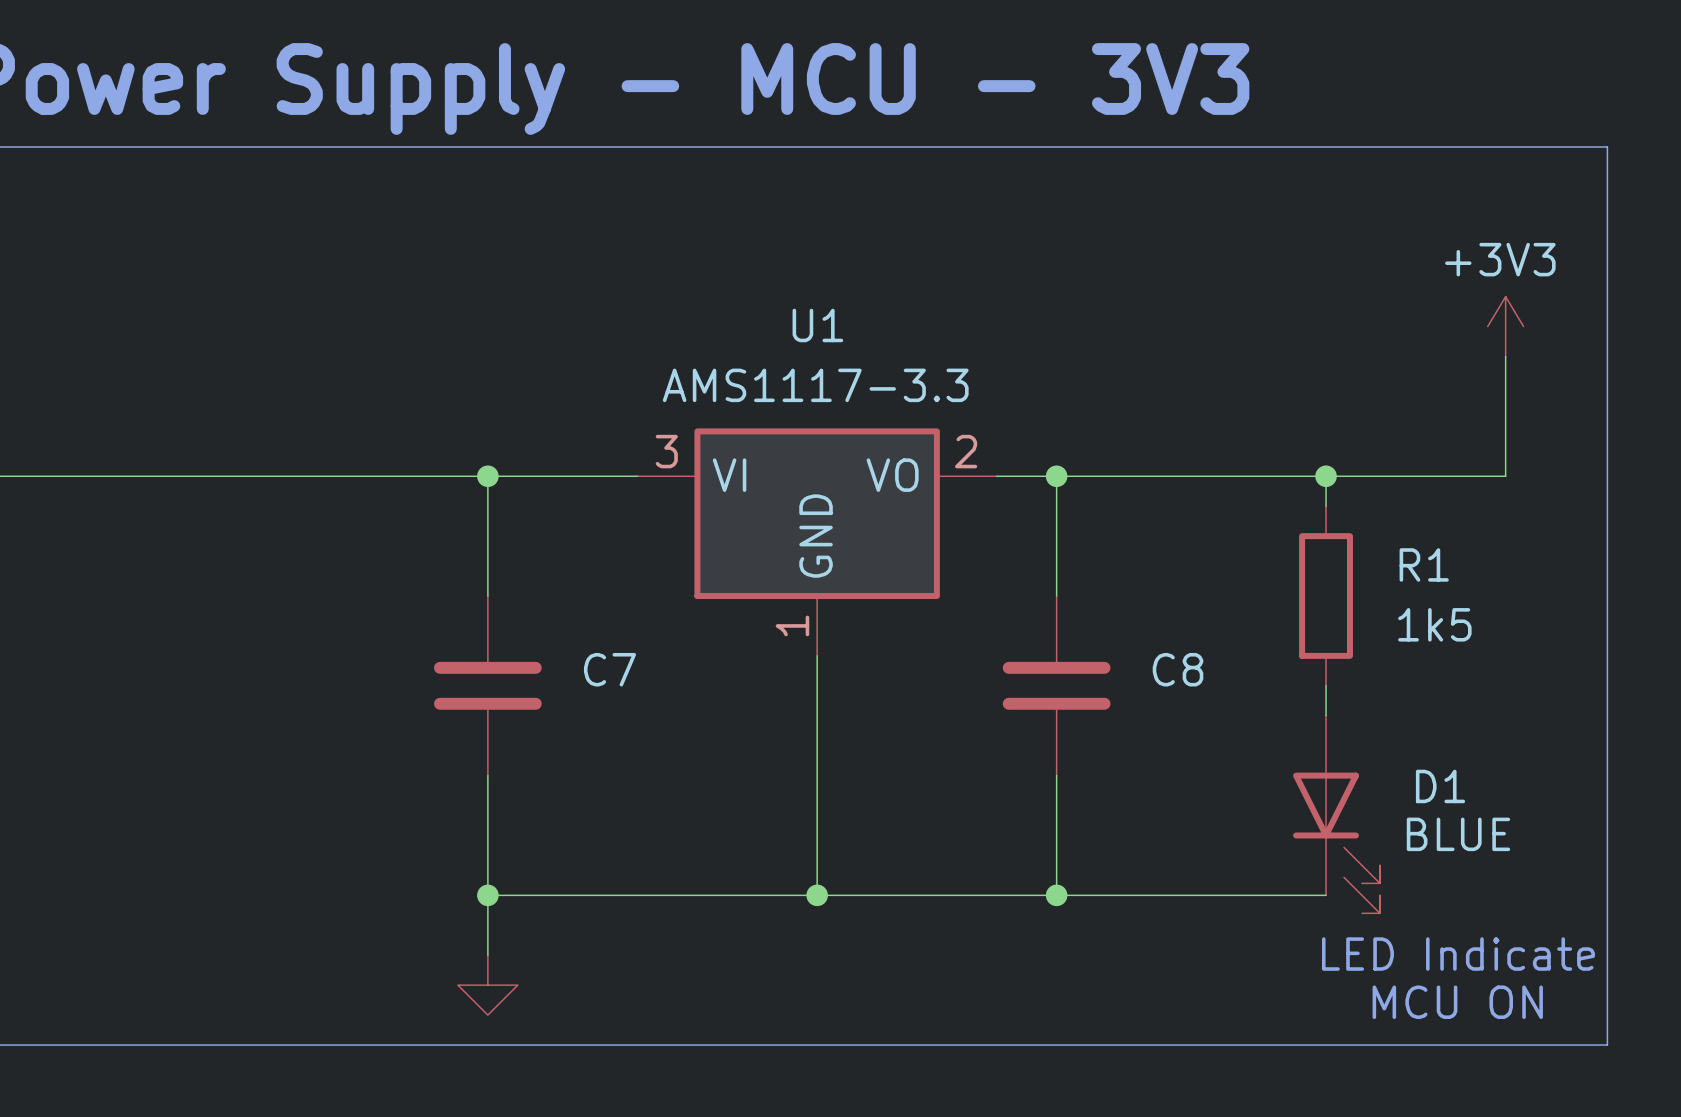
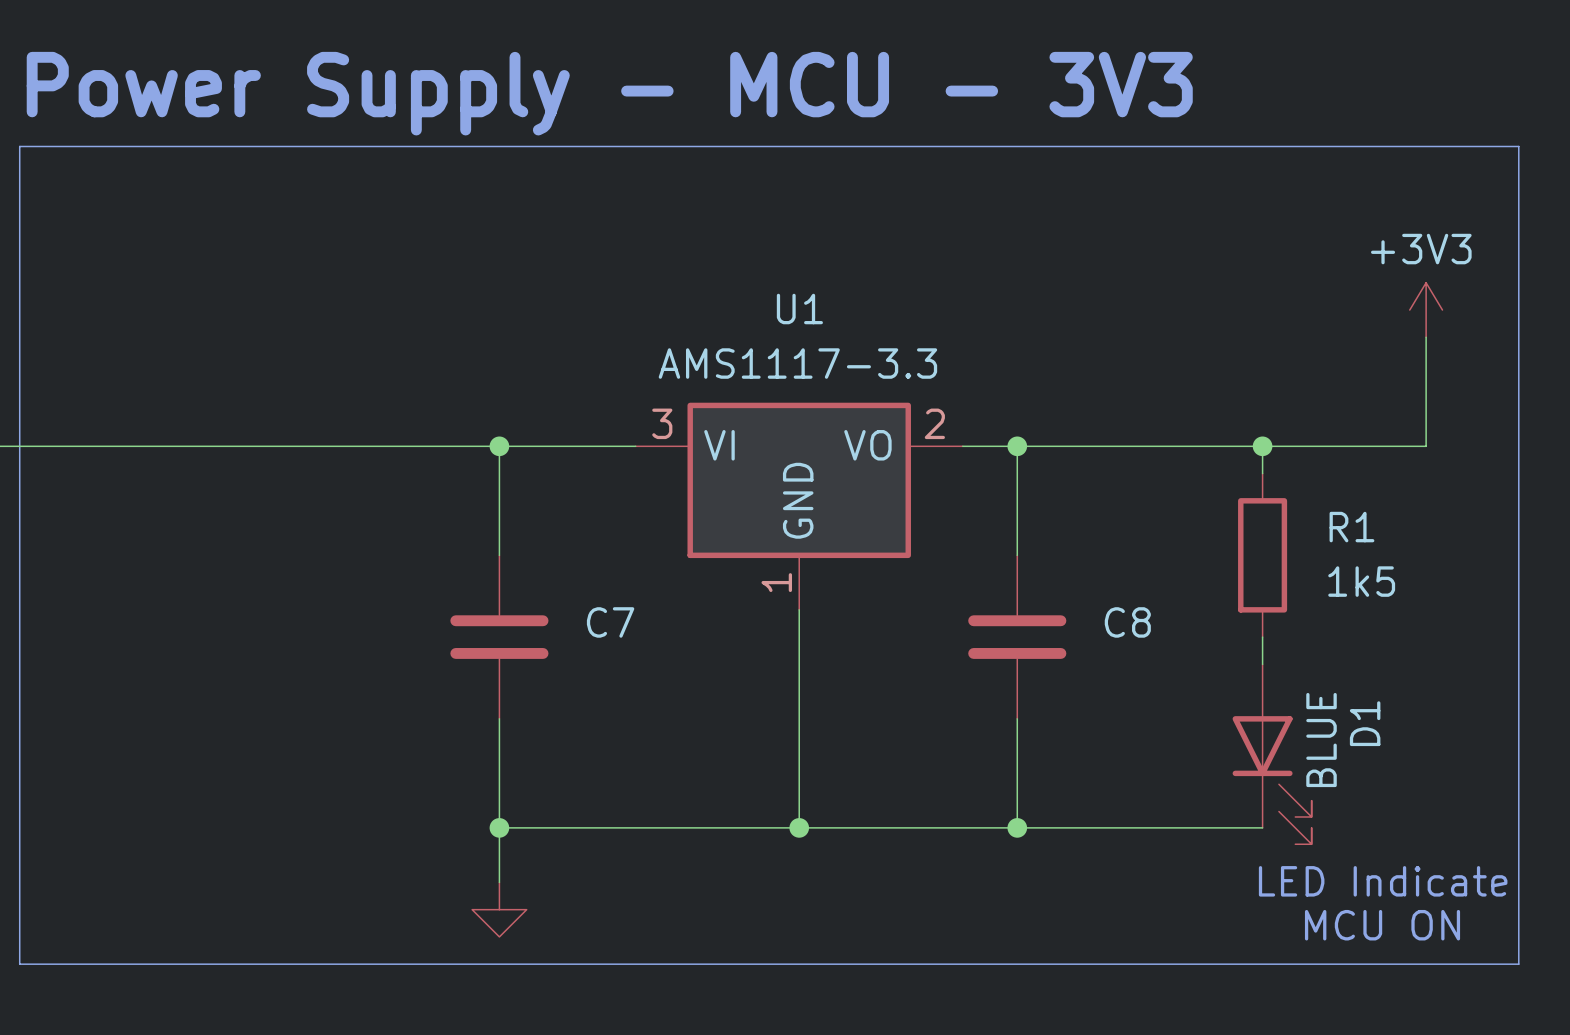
D1 name rotation: 0° (1440, 786) -> 90° counterclockwise (1365, 723)
D1 value rotation: 0° (1458, 834) -> 90° counterclockwise (1321, 740)

